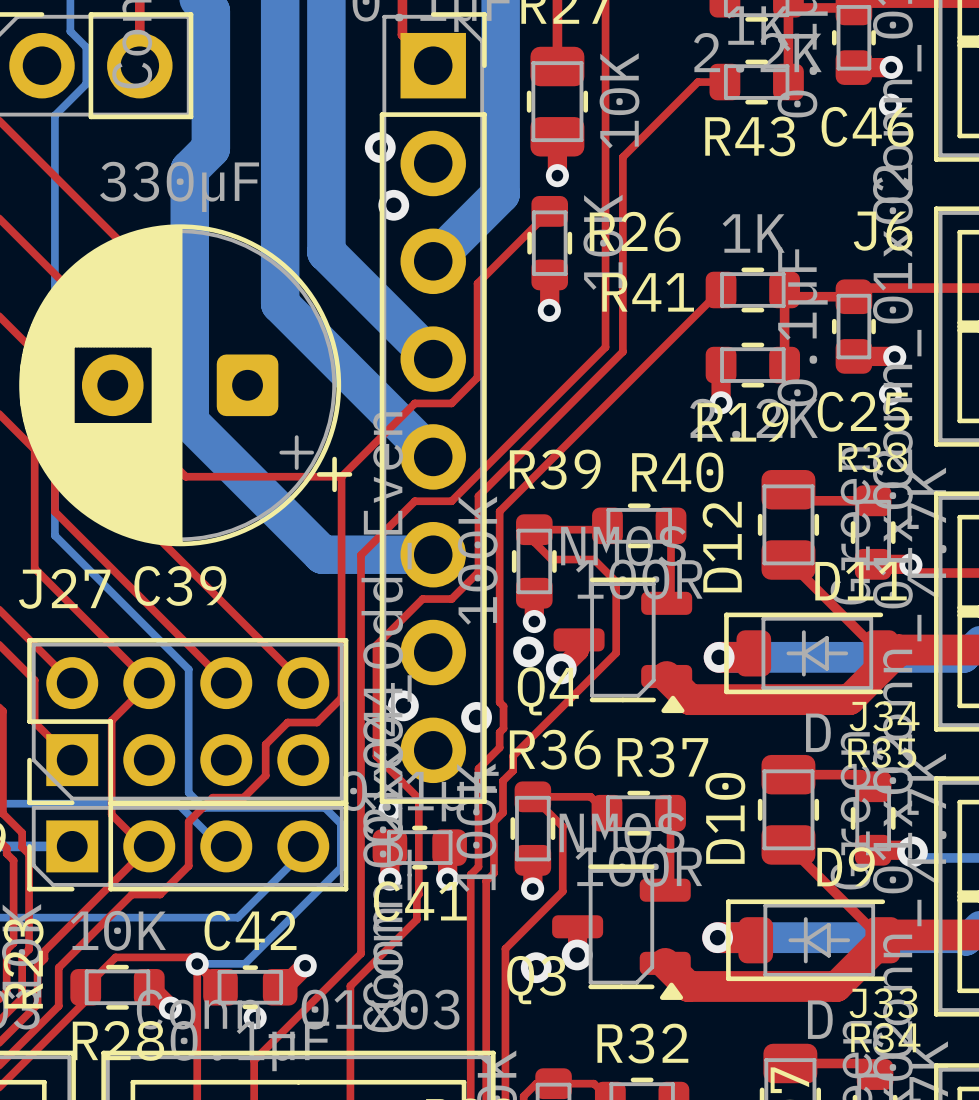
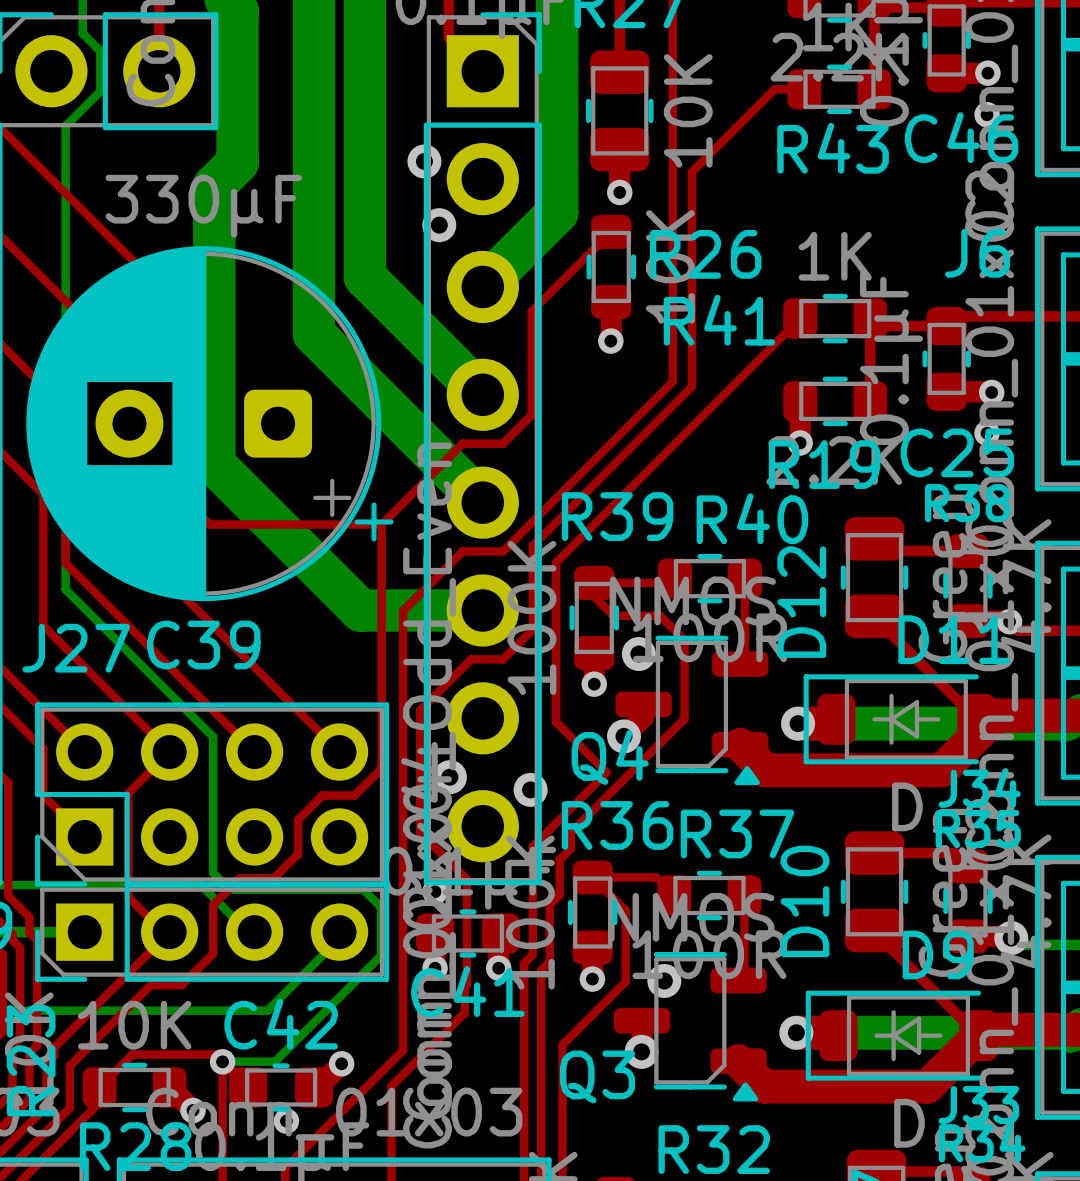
via position: (528, 651) -> (638, 654)
top track: (499, 655) (499, 702) (503, 706) (503, 728) (499, 732) (499, 747) -> (556, 721) (606, 772) (556, 823)
via position: (536, 967) -> (664, 980)

